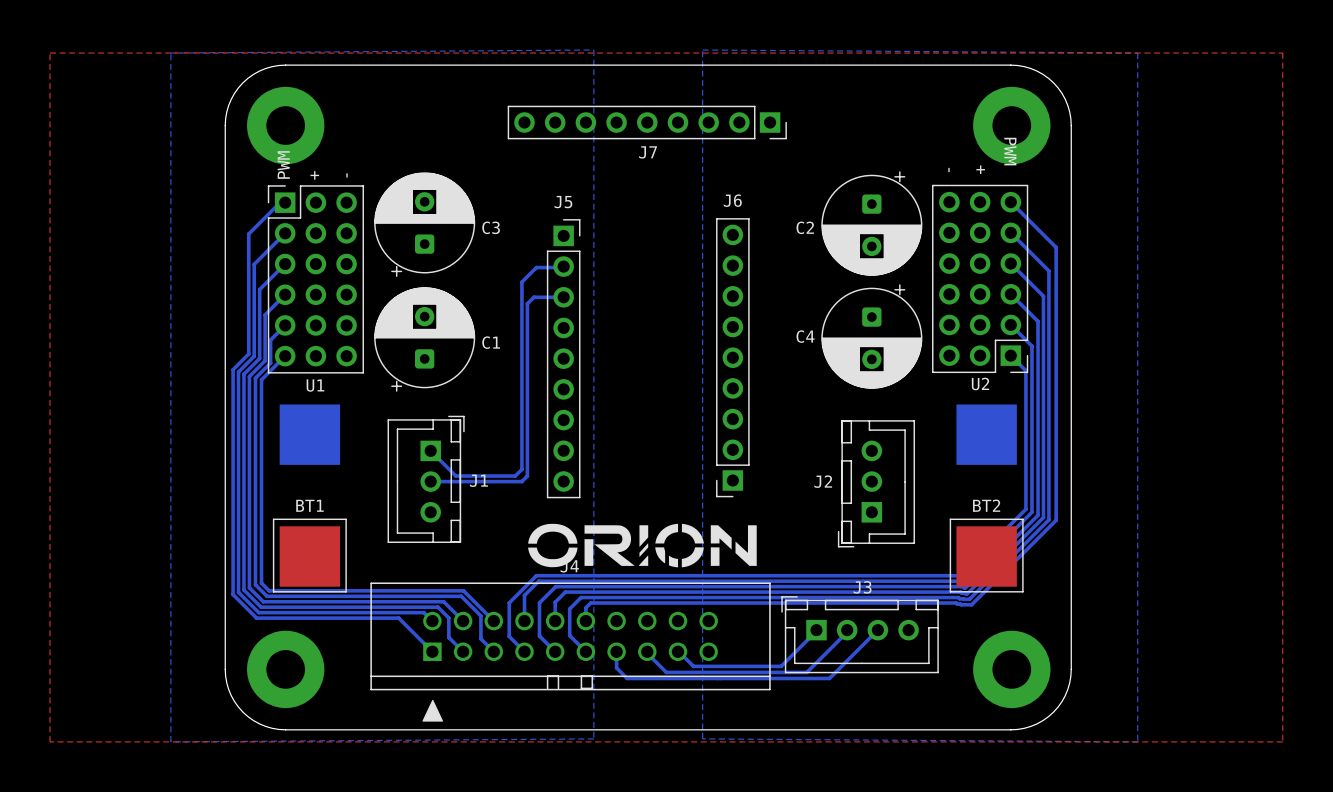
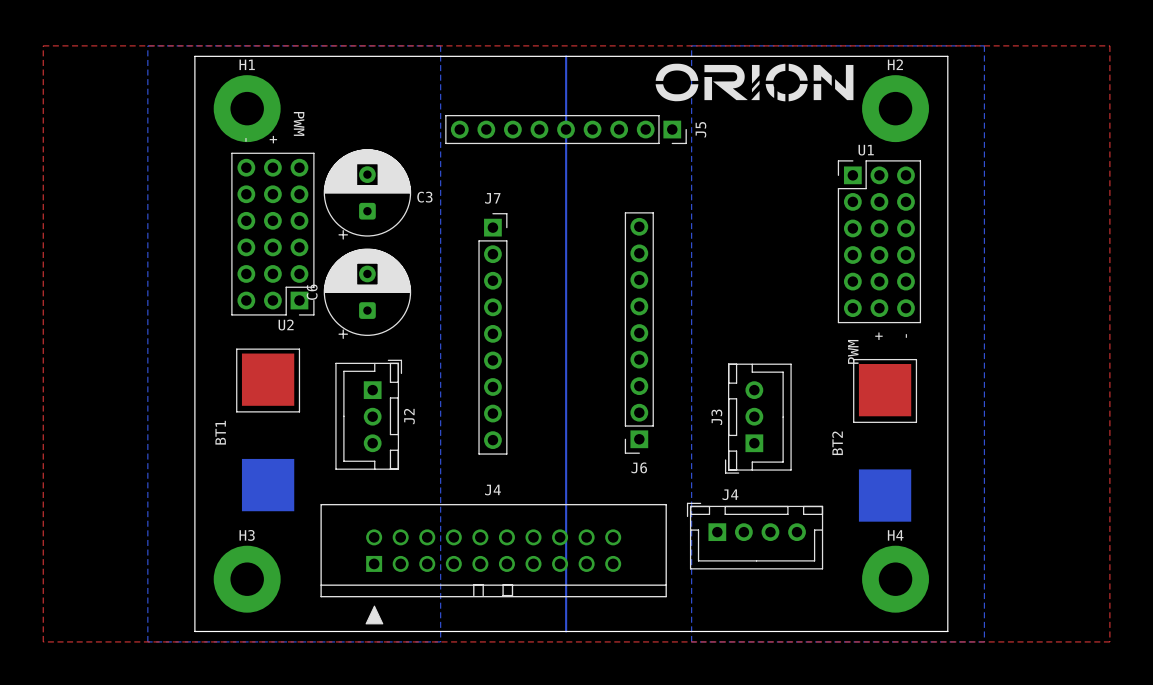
bottom zone outline: (170, 53) (593, 50) (593, 738) (170, 741) -> (147, 45) (440, 45) (440, 641) (147, 641)
bottom zone outline: (1137, 53) (702, 50) (702, 738) (1137, 741) -> (984, 45) (691, 45) (691, 641) (984, 641)
board edge: (285, 65) (265, 68) (253, 74) (242, 82) (231, 99) (226, 112) (225, 125) -> (247, 56) (194, 56) (194, 108)
bottom track: none -> (566, 56) (566, 631)
board edge: (1010, 65) (1030, 68) (1042, 74) (1053, 82) (1061, 93) (1067, 105) (1071, 125) (1070, 676) (1065, 695) (1058, 707) (1048, 716) (1030, 726) (1010, 729) -> (874, 56) (947, 56) (947, 631) (874, 631)
drawing: none -> [655, 63, 854, 102]
H1 name: none -> H1 (247, 64)
J7 rotation: 0° (647, 122) -> 90° counterclockwise (492, 333)
J7 position: (647, 122) -> (492, 333)
part: (1011, 125) -> none
H2: none -> (895, 108)
J7 name position: J7 (648, 152) -> J7 (492, 198)
U1 text position: PWM (283, 165) -> PWM (853, 351)
U1 text position: + (314, 175) -> + (878, 336)
U1 text position: - (347, 175) -> - (906, 335)
J6 name position: J6 (732, 200) -> J6 (639, 467)
bottom track: (285, 202) (280, 202) (248, 234) (248, 354) (233, 369) (233, 594) (256, 618) (398, 618) (432, 651) -> none
bottom track: (1010, 202) (1056, 247) (1056, 520) (971, 604) (956, 602) (590, 602) (585, 607) (585, 621) -> none
C2: (871, 223) -> none
bottom track: (1010, 232) (1048, 270) (1048, 519) (969, 599) (958, 597) (581, 597) (569, 608) (569, 635) (585, 651) -> none
bottom track: (285, 233) (254, 264) (254, 356) (238, 371) (238, 592) (258, 612) (423, 612) (432, 621) -> none
bottom track: (1010, 263) (1043, 296) (1043, 517) (967, 593) (960, 592) (565, 592) (555, 602) (555, 621) -> none
bottom track: (285, 264) (259, 289) (259, 358) (243, 374) (243, 590) (261, 607) (438, 607) (448, 618) (448, 637) (463, 650) -> none
bottom track: (563, 266) (536, 267) (521, 282) (521, 469) (515, 476) (455, 476) (430, 450) -> none
U2 position: (980, 278) -> (272, 234)
U1 position: (315, 279) -> (879, 241)
bottom track: (285, 294) (265, 314) (265, 360) (249, 376) (249, 587) (263, 601) (443, 601) (463, 621) -> none
bottom track: (1010, 294) (1038, 321) (1038, 515) (965, 587) (555, 586) (539, 602) (539, 636) (555, 651) -> none
bottom track: (563, 297) (533, 297) (527, 303) (527, 476) (521, 481) (430, 481) -> none
bottom track: (1010, 324) (1031, 346) (1031, 512) (961, 581) (538, 581) (524, 595) (524, 621) -> none
bottom track: (285, 325) (270, 340) (270, 363) (255, 378) (255, 584) (266, 596) (461, 596) (480, 615) (480, 638) (493, 651) -> none
C4: (871, 336) -> none
C1 name: C1 (491, 342) -> C6 (312, 292)
bottom track: (1010, 355) (1025, 370) (1025, 509) (959, 575) (536, 575) (509, 602) (509, 636) (524, 651) -> none
bottom track: (285, 356) (261, 379) (261, 583) (269, 590) (463, 590) (493, 621) -> none
J6 position: (732, 357) -> (639, 333)
J5 rotation: 0° (563, 358) -> 90° clockwise (566, 129)
J5 position: (563, 358) -> (566, 129)
U2 name position: U2 (980, 383) -> U2 (286, 325)
U1 name position: U1 (315, 385) -> U1 (866, 150)
J1 name: J1 (478, 480) -> J2 (409, 416)
J2 name: J2 (823, 481) -> J3 (716, 417)
BT1 rotation: 0° (309, 498) -> 180° (268, 429)
BT2 rotation: 0° (986, 498) -> 180° (885, 440)
BT1 name position: BT1 (309, 505) -> BT1 (220, 432)
BT2 name position: BT2 (986, 505) -> BT2 (837, 443)
drawing: [528, 523, 757, 568] -> none
H3 name: none -> H3 (247, 535)
J4: none -> (755, 536)
bottom track: (816, 630) (781, 666) (693, 666) (677, 651) -> none
bottom track: (847, 630) (806, 672) (666, 672) (647, 651) -> none
bottom track: (877, 630) (829, 678) (627, 678) (616, 667) (616, 651) -> none
J3: (860, 634) -> none
board edge: (225, 669) (228, 689) (234, 701) (242, 712) (253, 720) (265, 726) (285, 729) -> (194, 579) (194, 631) (247, 631)
part: (1011, 669) -> none
H4: none -> (895, 579)

